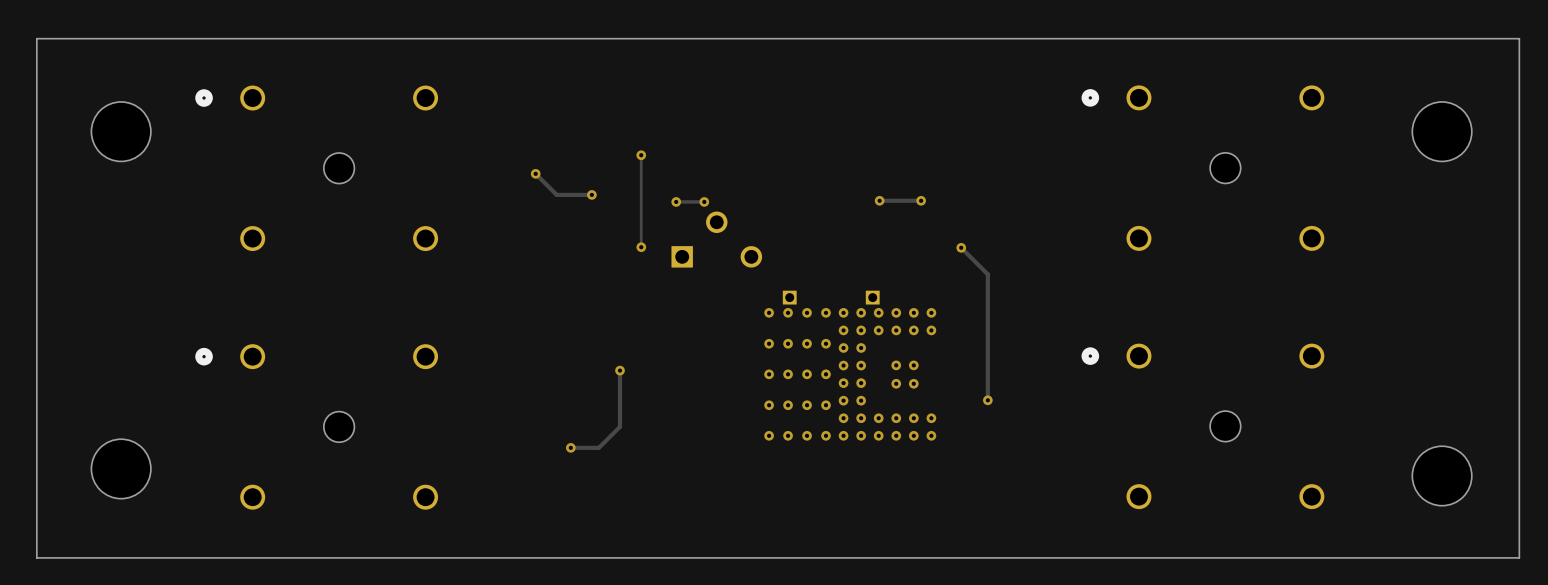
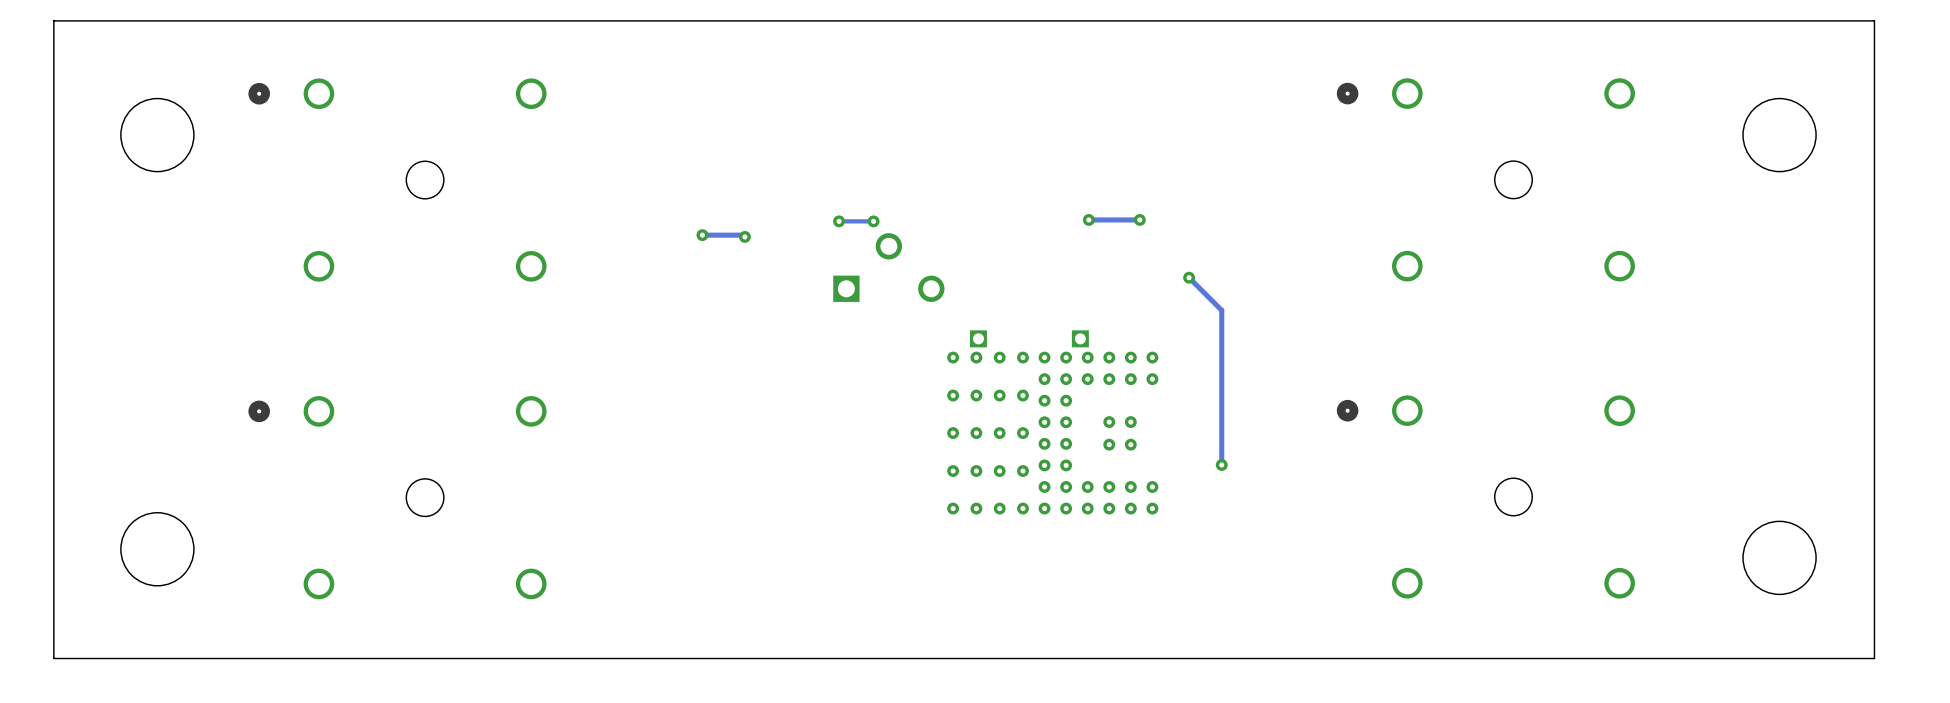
track: (641, 155) (641, 247) -> none
via: (641, 155) -> none
track: (535, 173) (556, 194) (591, 194) -> none
via: (535, 173) -> none
via: (591, 194) -> none
track: none -> (702, 235) (743, 235) (744, 236)
via: none -> (702, 235)
via: none -> (744, 236)
via: (641, 247) -> none
track: (620, 370) (620, 426) (598, 447) (570, 447) -> none
via: (620, 370) -> none
via: (570, 447) -> none

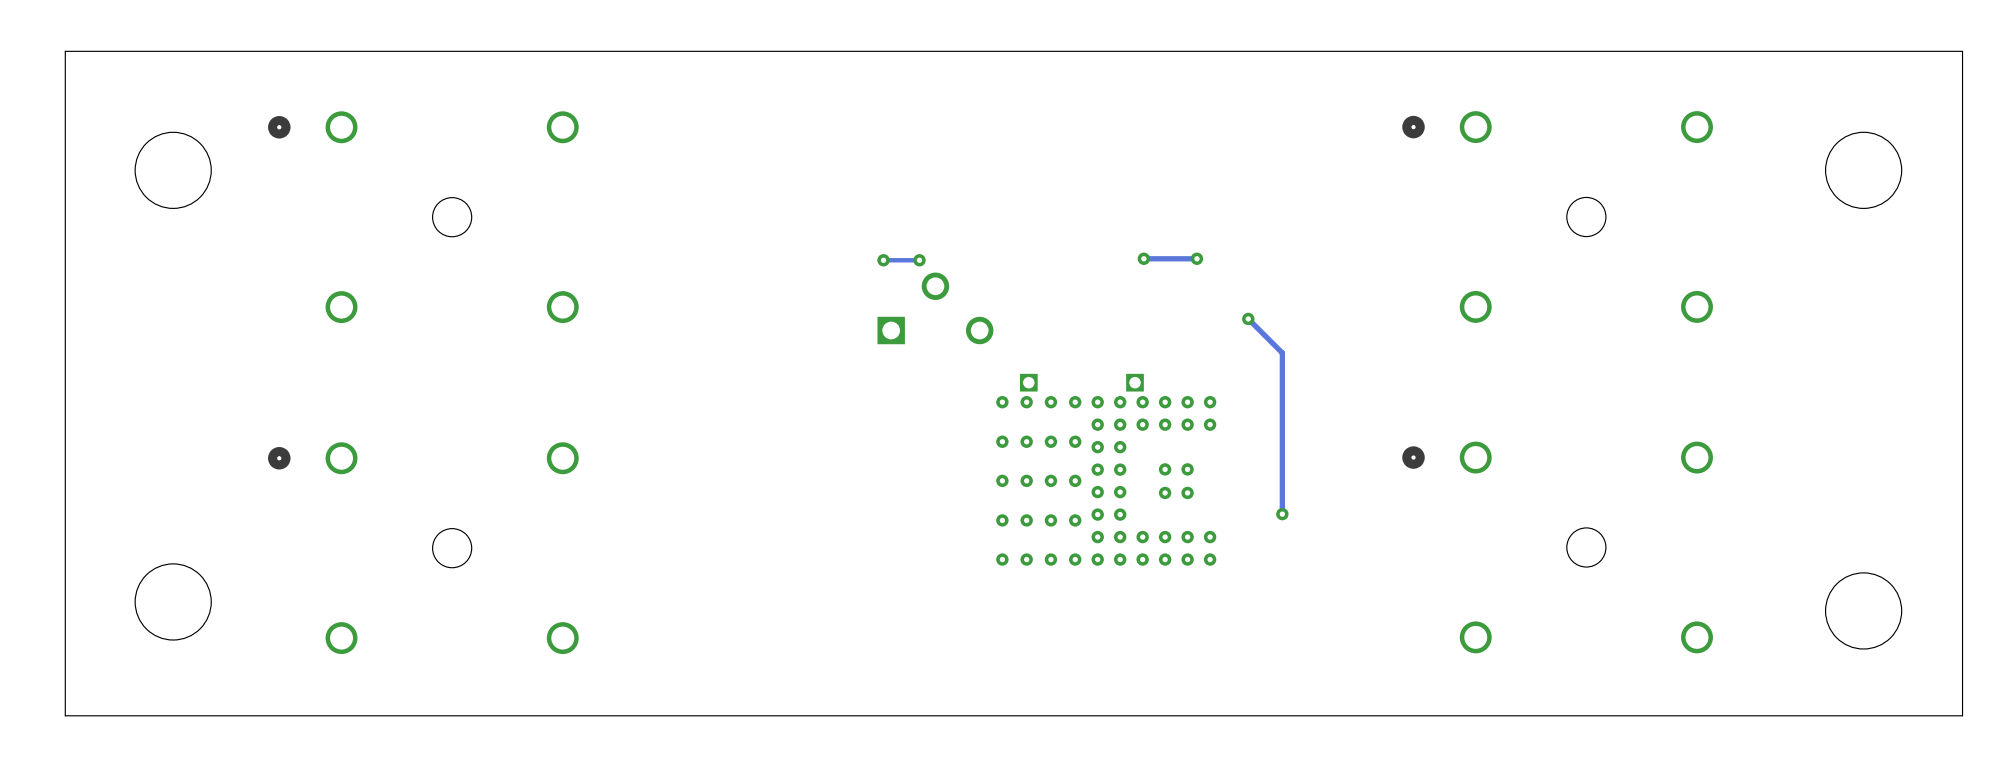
track: (702, 235) (743, 235) (744, 236) -> none
via: (702, 235) -> none
via: (744, 236) -> none

